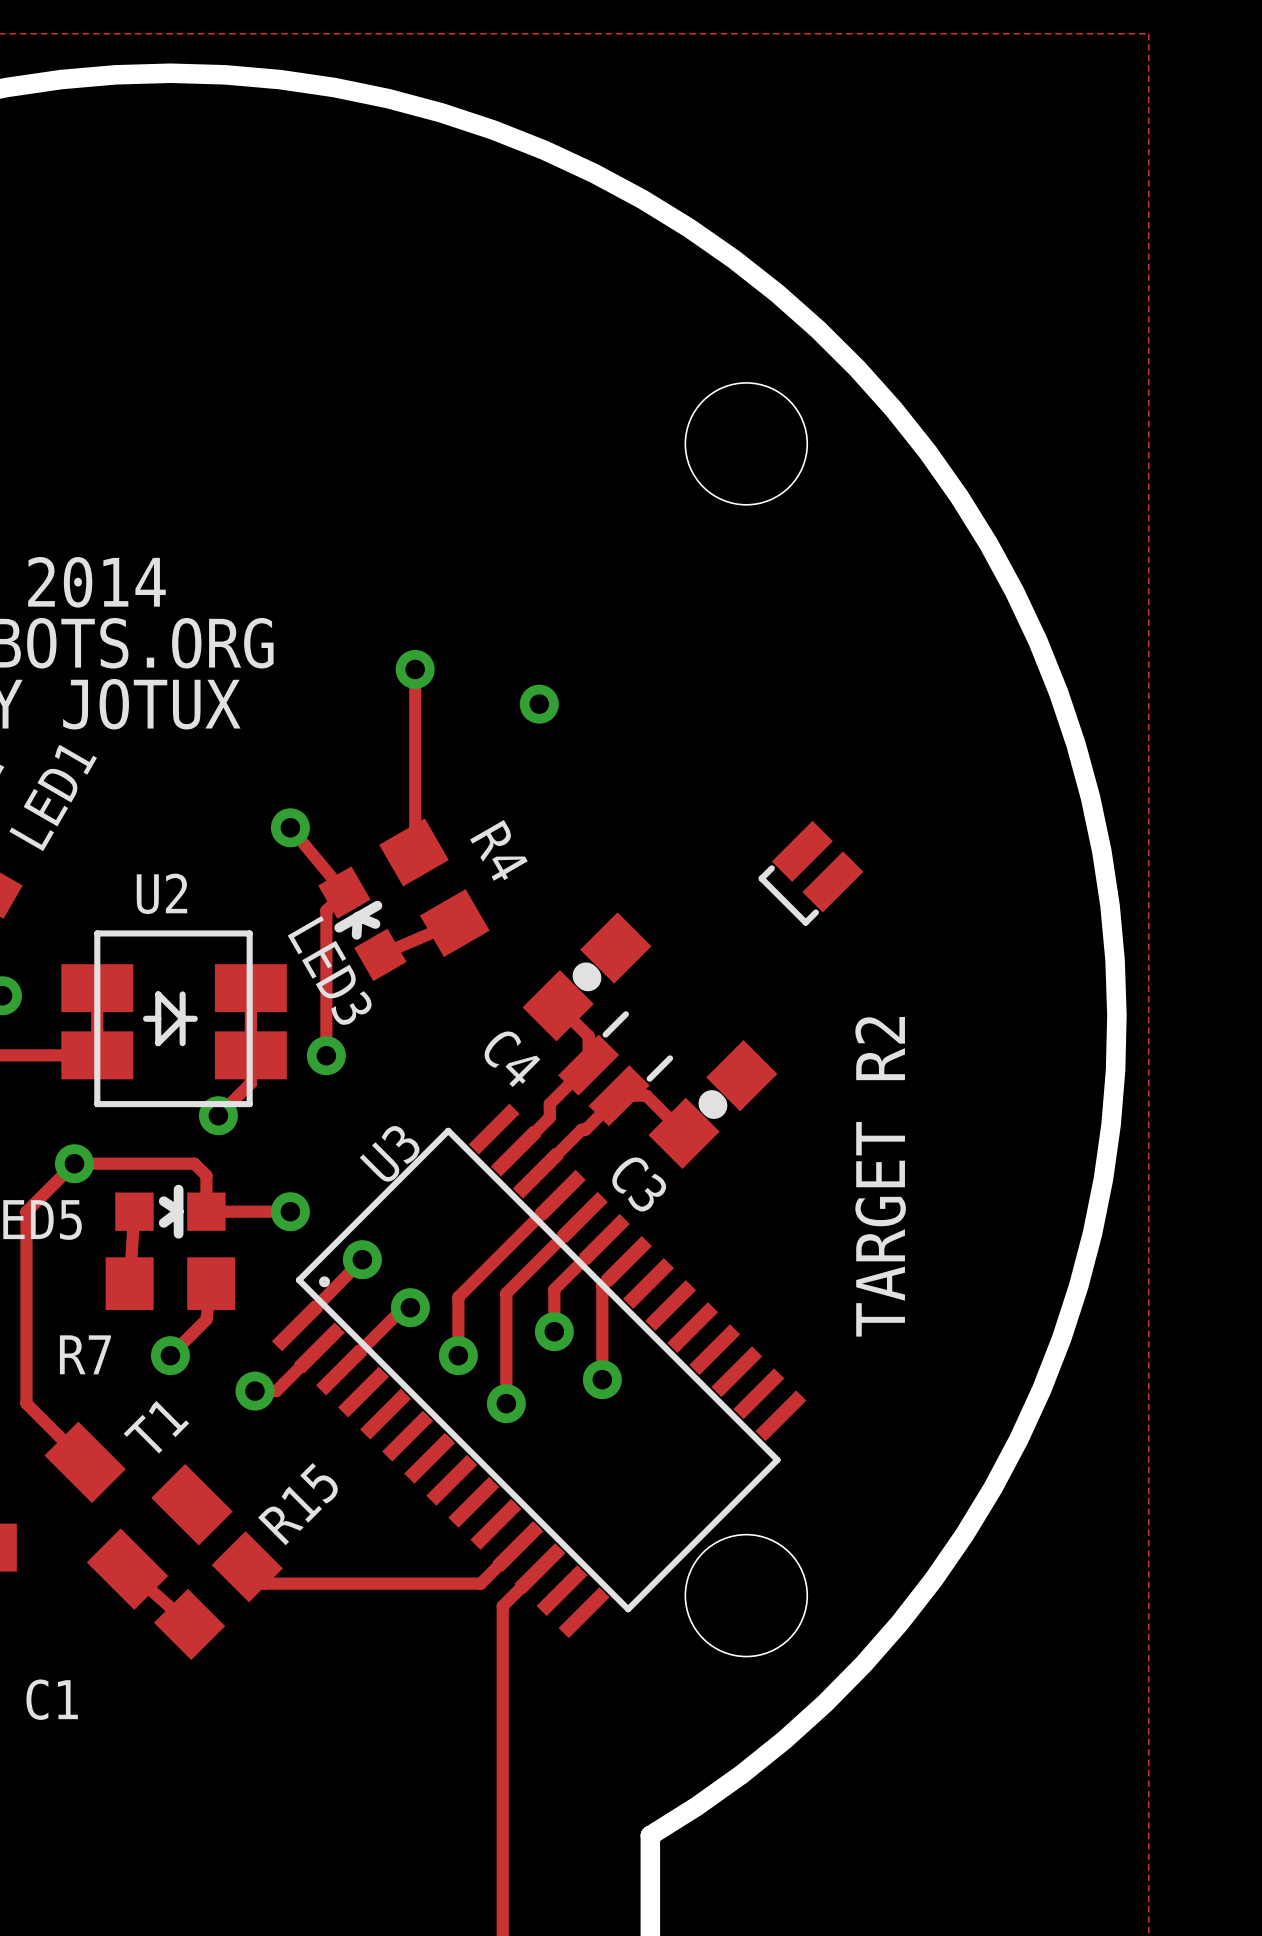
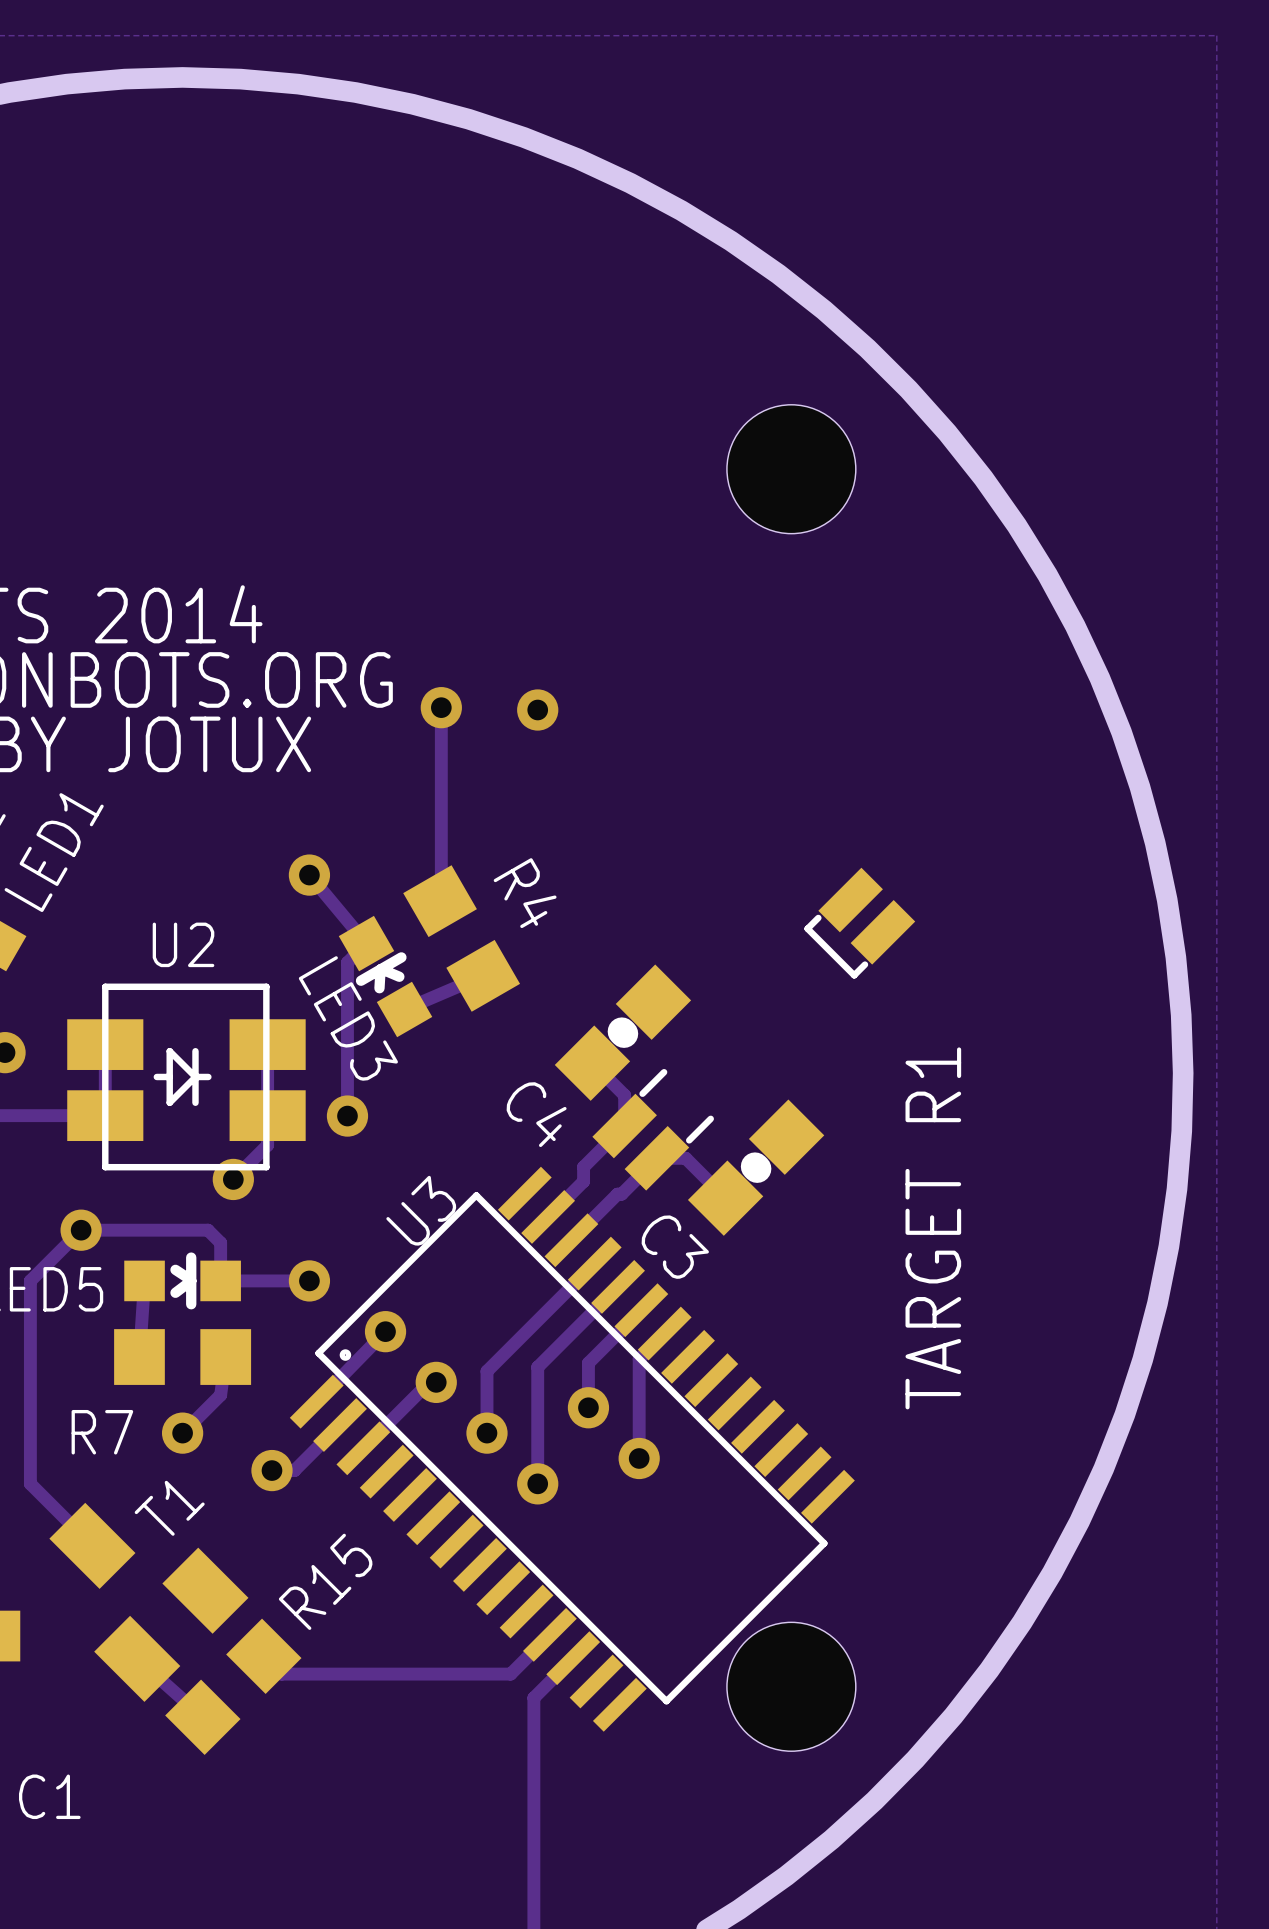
via position: (539, 704) -> (537, 709)
text: TARGET R2 (880, 1176) -> TARGET R1 (933, 1228)

